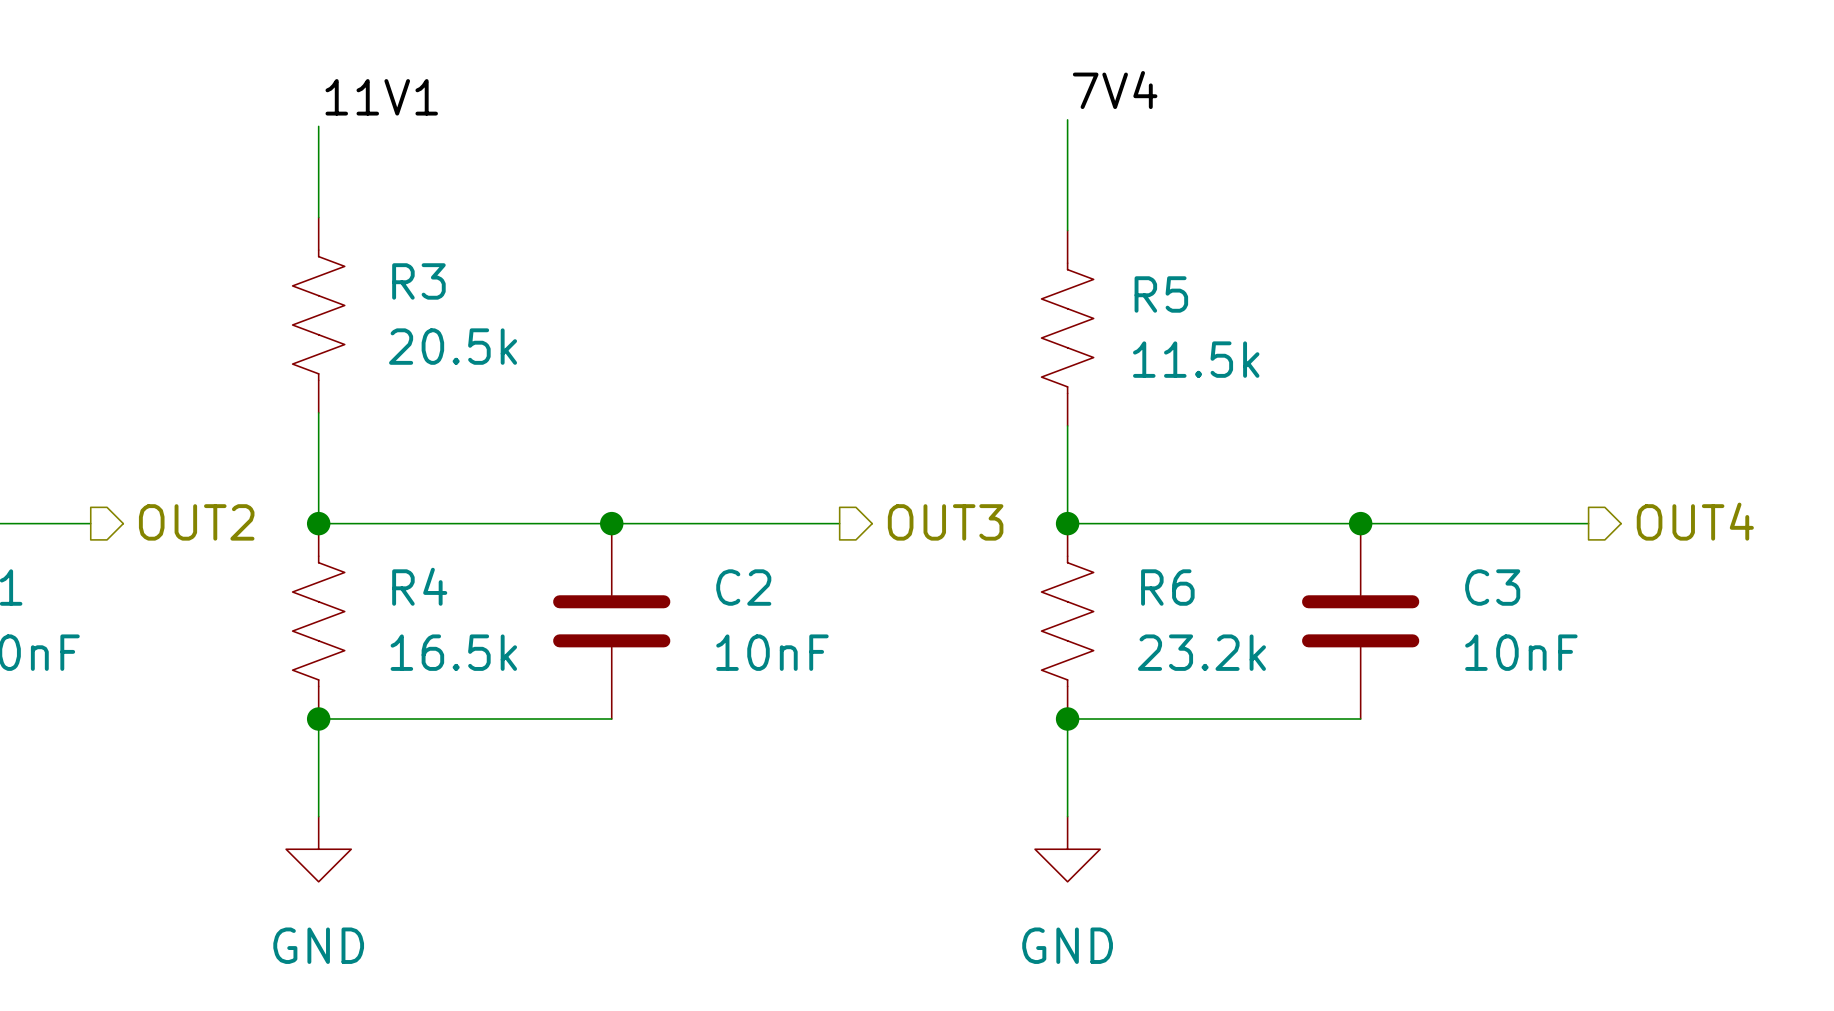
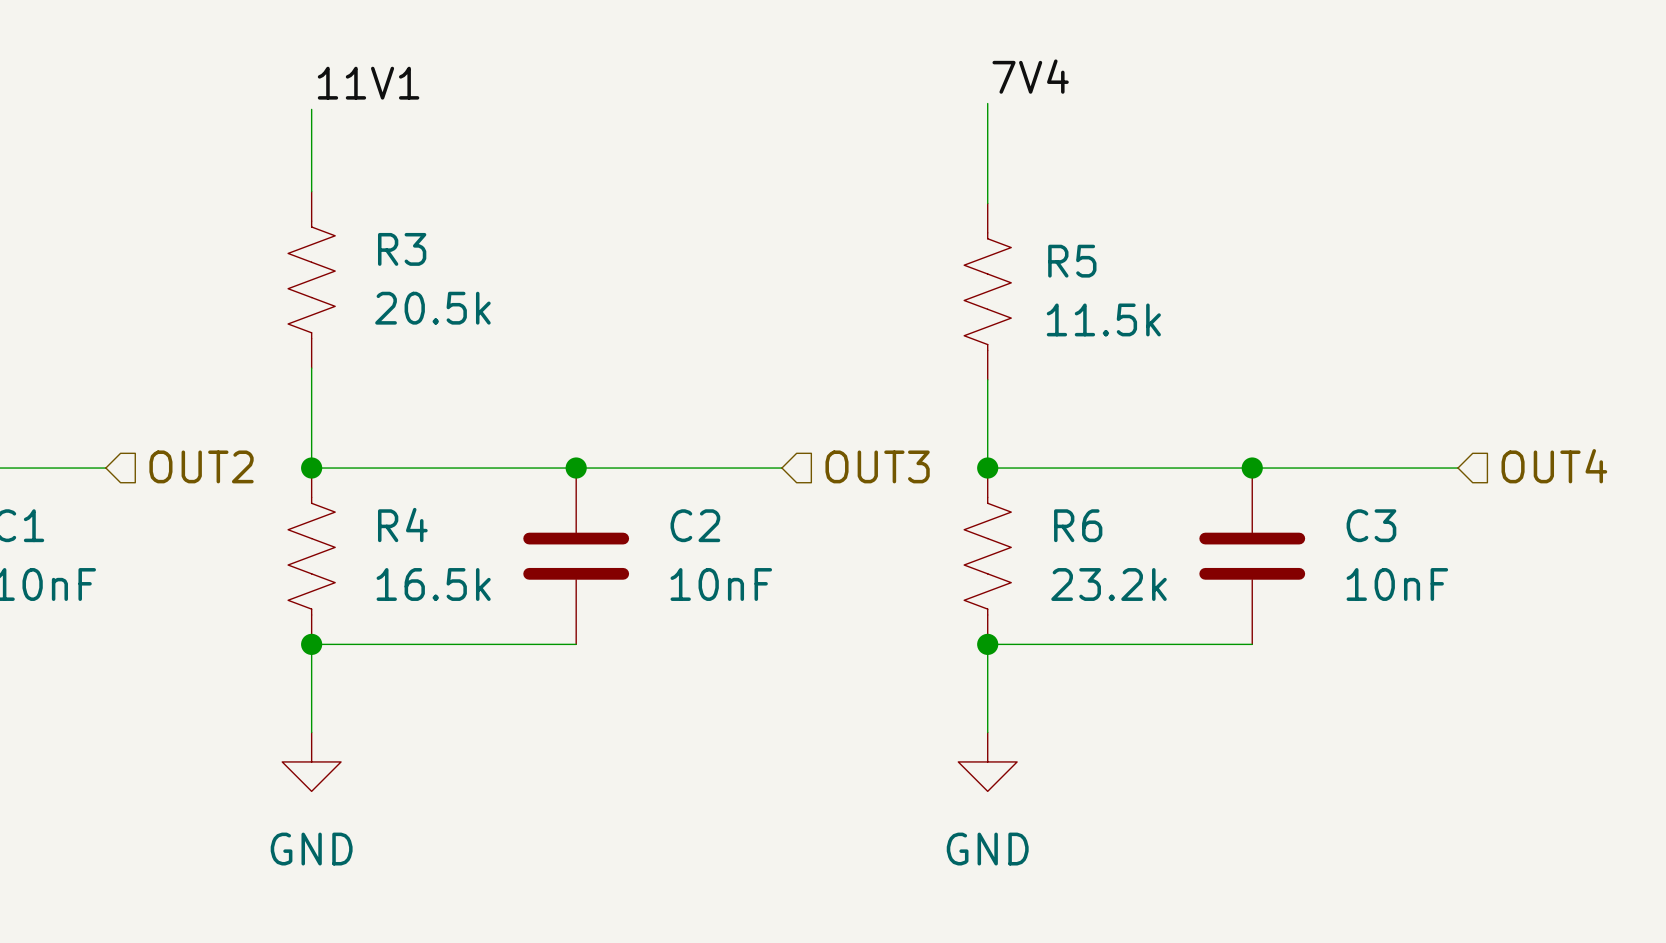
hierarchical label shape: output (1695, 521) -> input (1554, 466)
hierarchical label shape: output (196, 522) -> input (201, 466)
hierarchical label shape: output (945, 522) -> input (877, 466)

